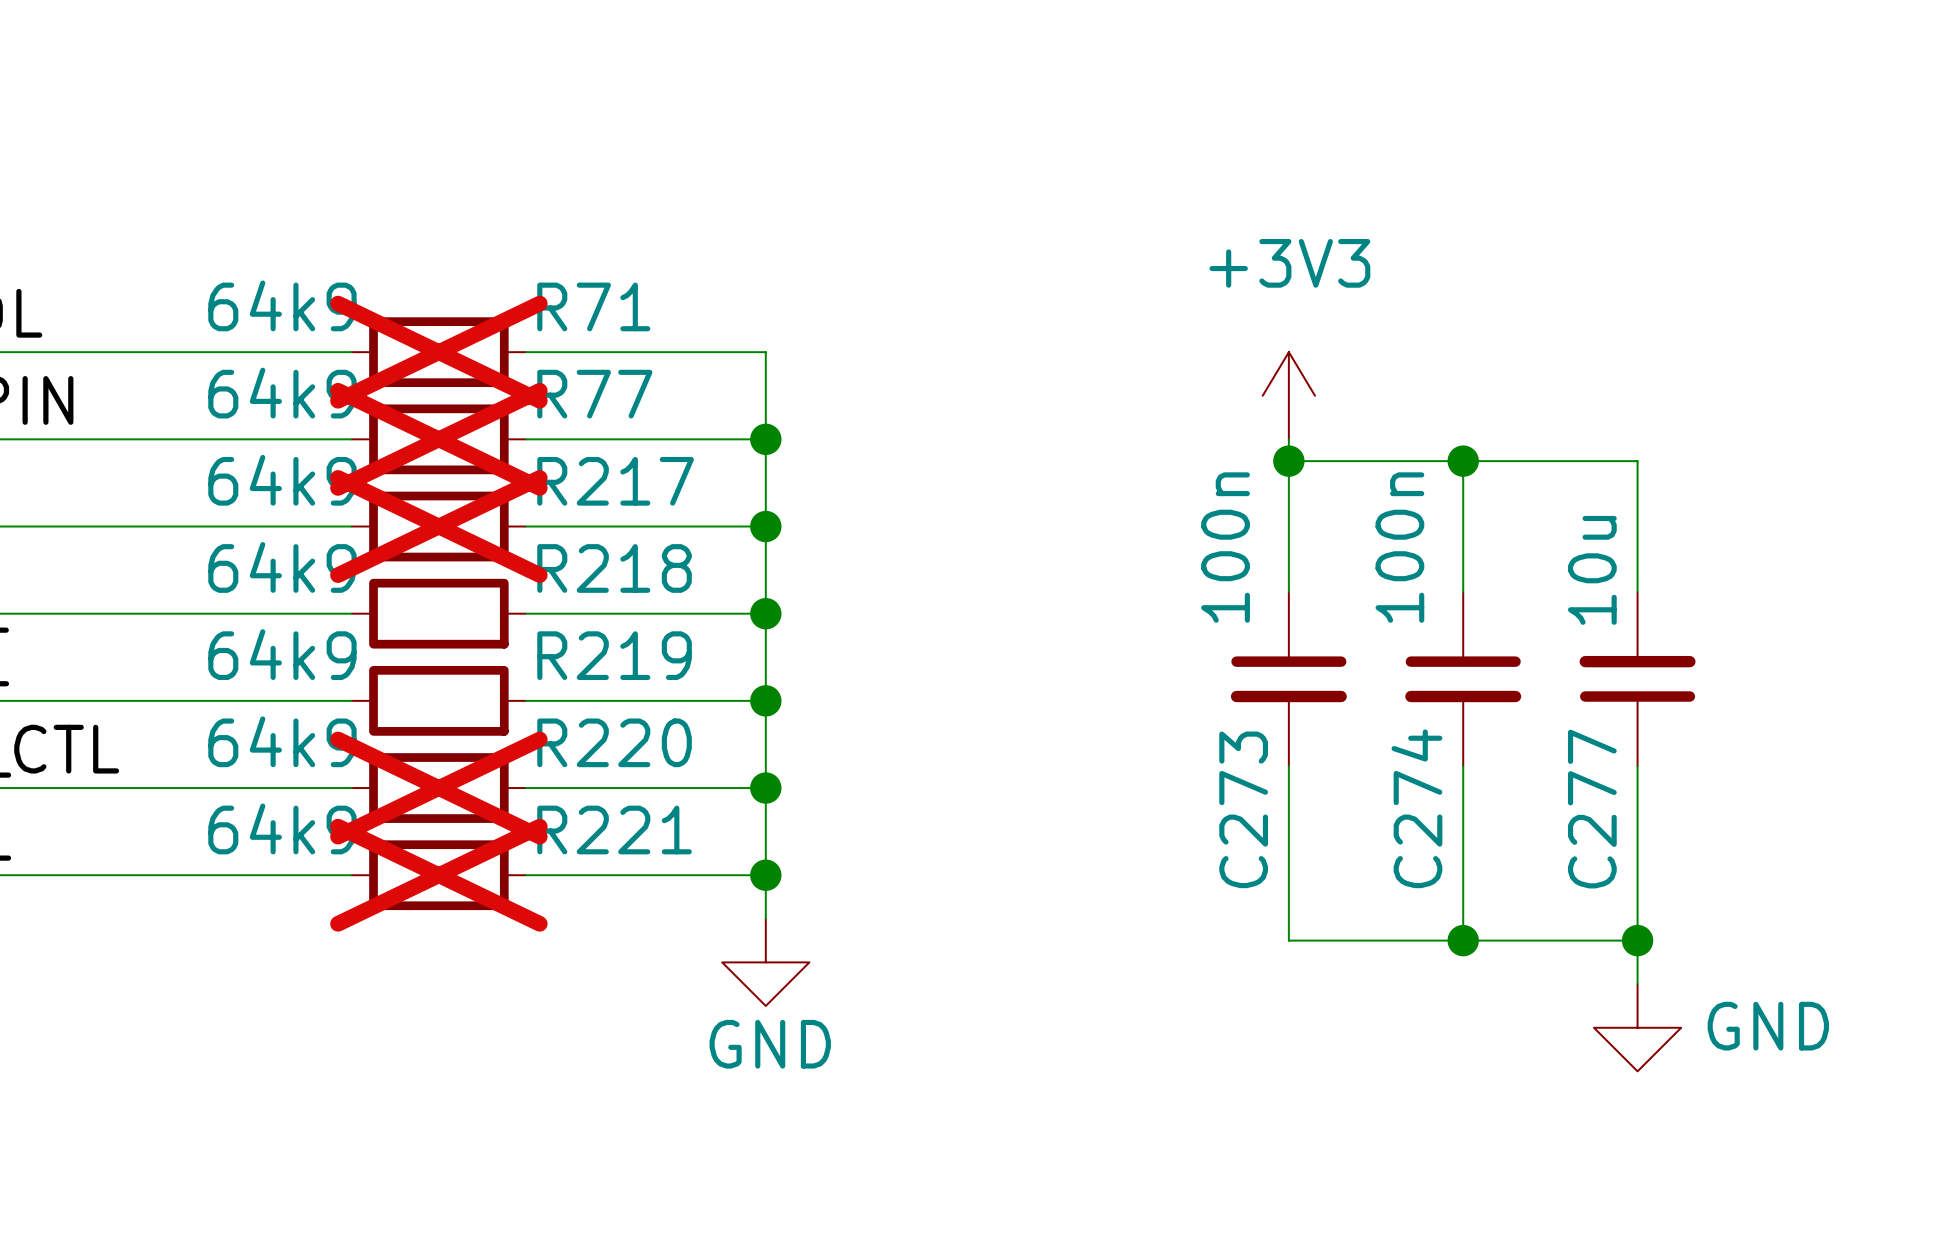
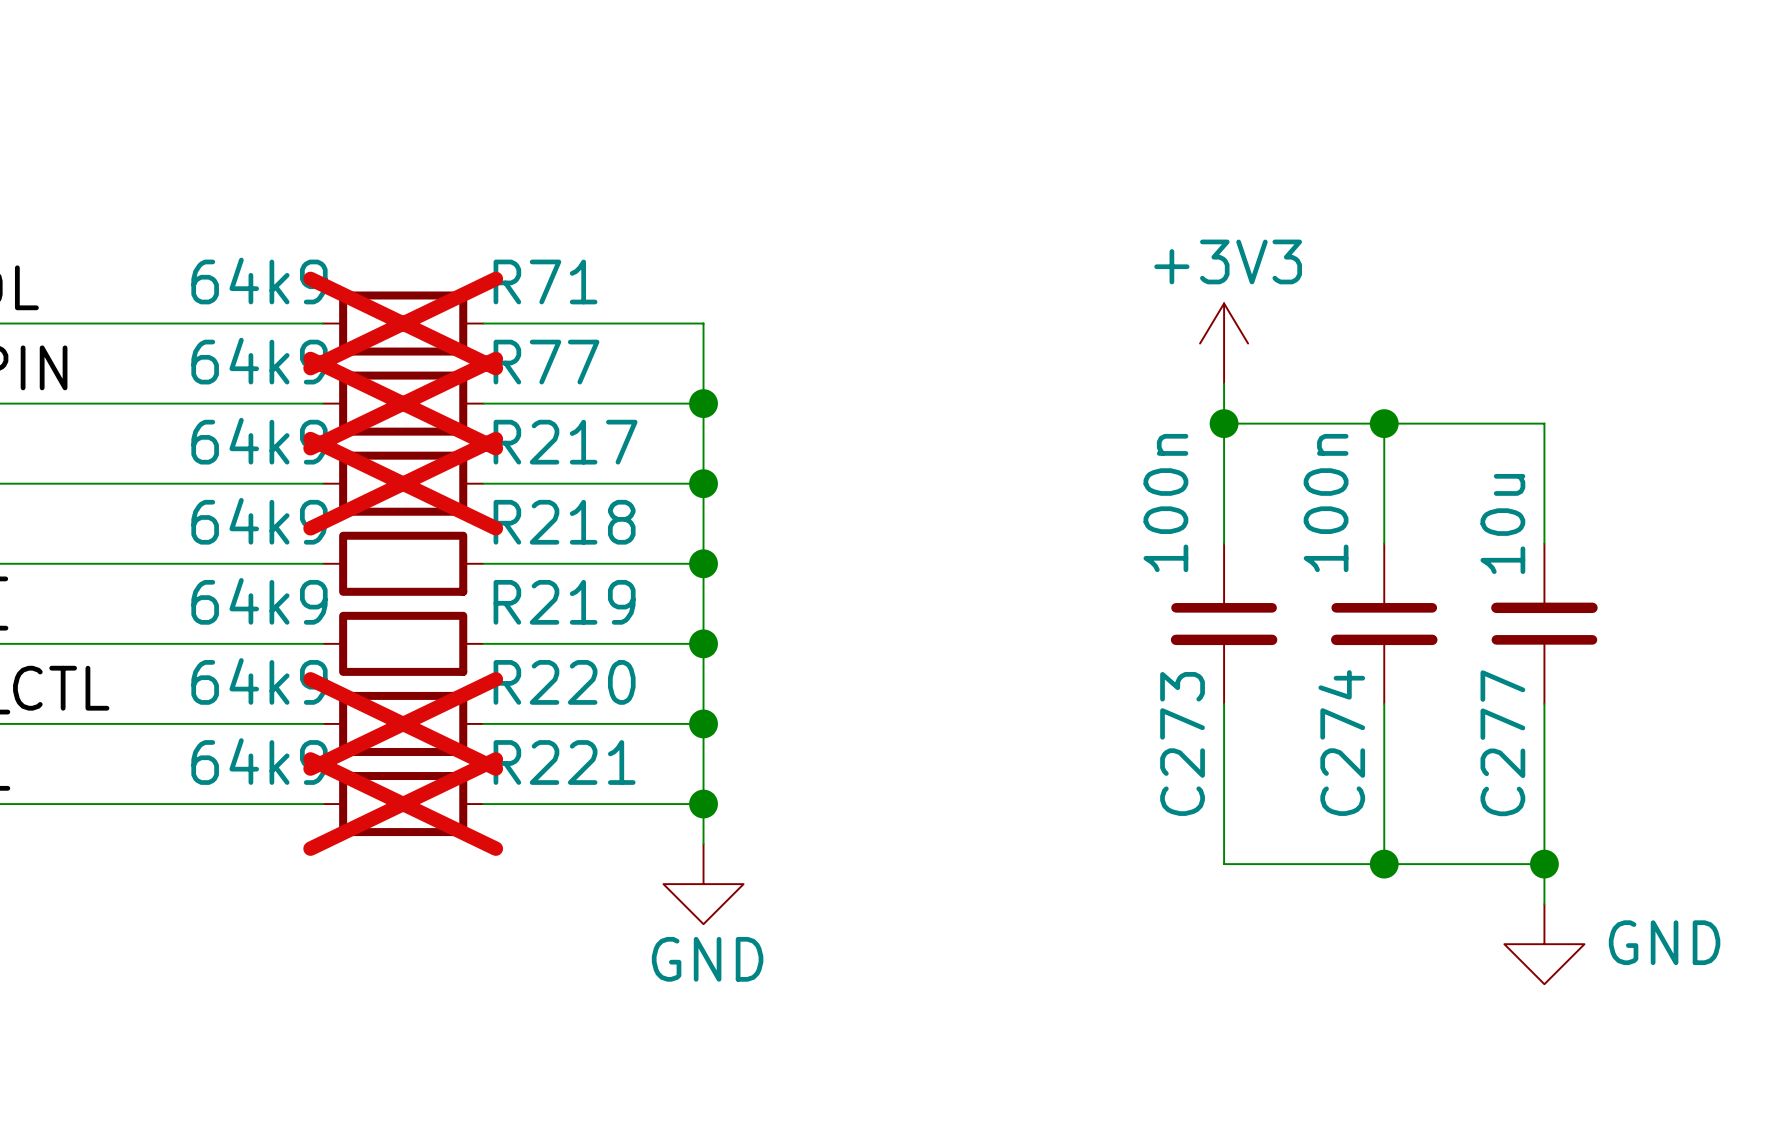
power symbol text position: +3V3 (1289, 263) -> +3V3 (1228, 261)
power symbol position: +3V3 (1288, 395) -> +3V3 (1224, 343)
wire: none -> (1224, 383) (1224, 543)
wire: (1288, 439) (1288, 591) -> none
wire: (1288, 461) (1332, 461) -> (1504, 864) (1544, 864)
junction position: (1288, 461) -> (1224, 423)
wire: (1463, 461) (1463, 591) -> (1384, 423) (1384, 543)
junction position: (1463, 461) -> (1384, 423)
wire: (1637, 461) (1637, 591) -> (1504, 423) (1544, 423) (1544, 543)
C273 position: (1288, 679) -> (1224, 623)
C274 position: (1463, 679) -> (1384, 623)
C277 position: (1637, 679) -> (1544, 623)
wire: (1288, 766) (1288, 940) (1332, 940) -> (1224, 703) (1224, 864)
wire: (1463, 766) (1463, 940) -> (1384, 703) (1384, 864)
wire: (1637, 766) (1637, 984) -> (1544, 703) (1544, 904)
junction position: (1463, 940) -> (1384, 864)
junction position: (1637, 940) -> (1544, 864)
power symbol position: GND (1637, 1027) -> GND (1544, 944)

